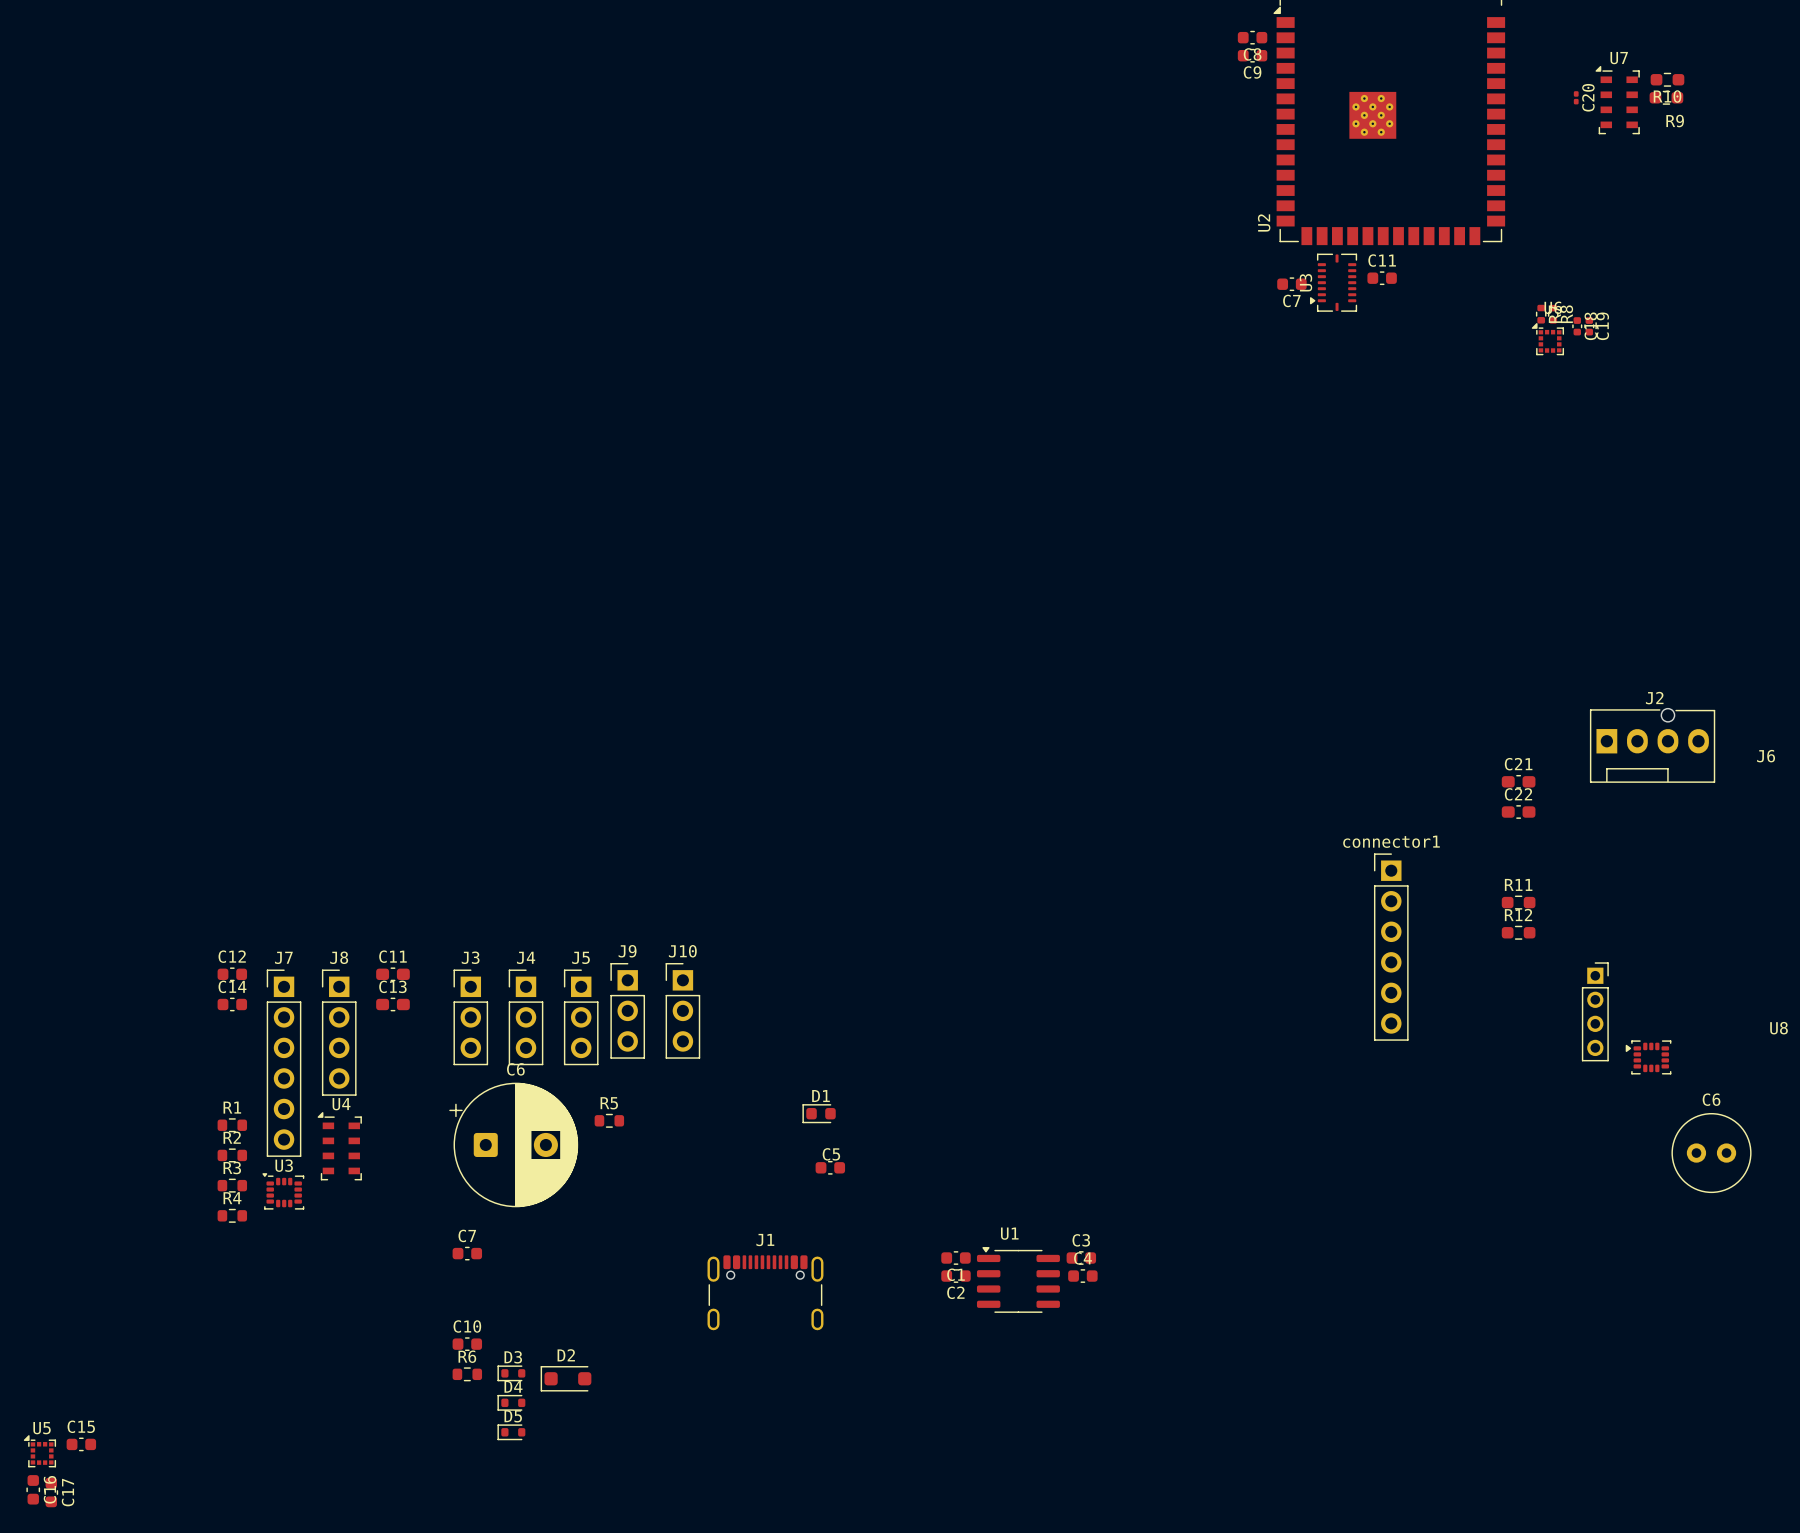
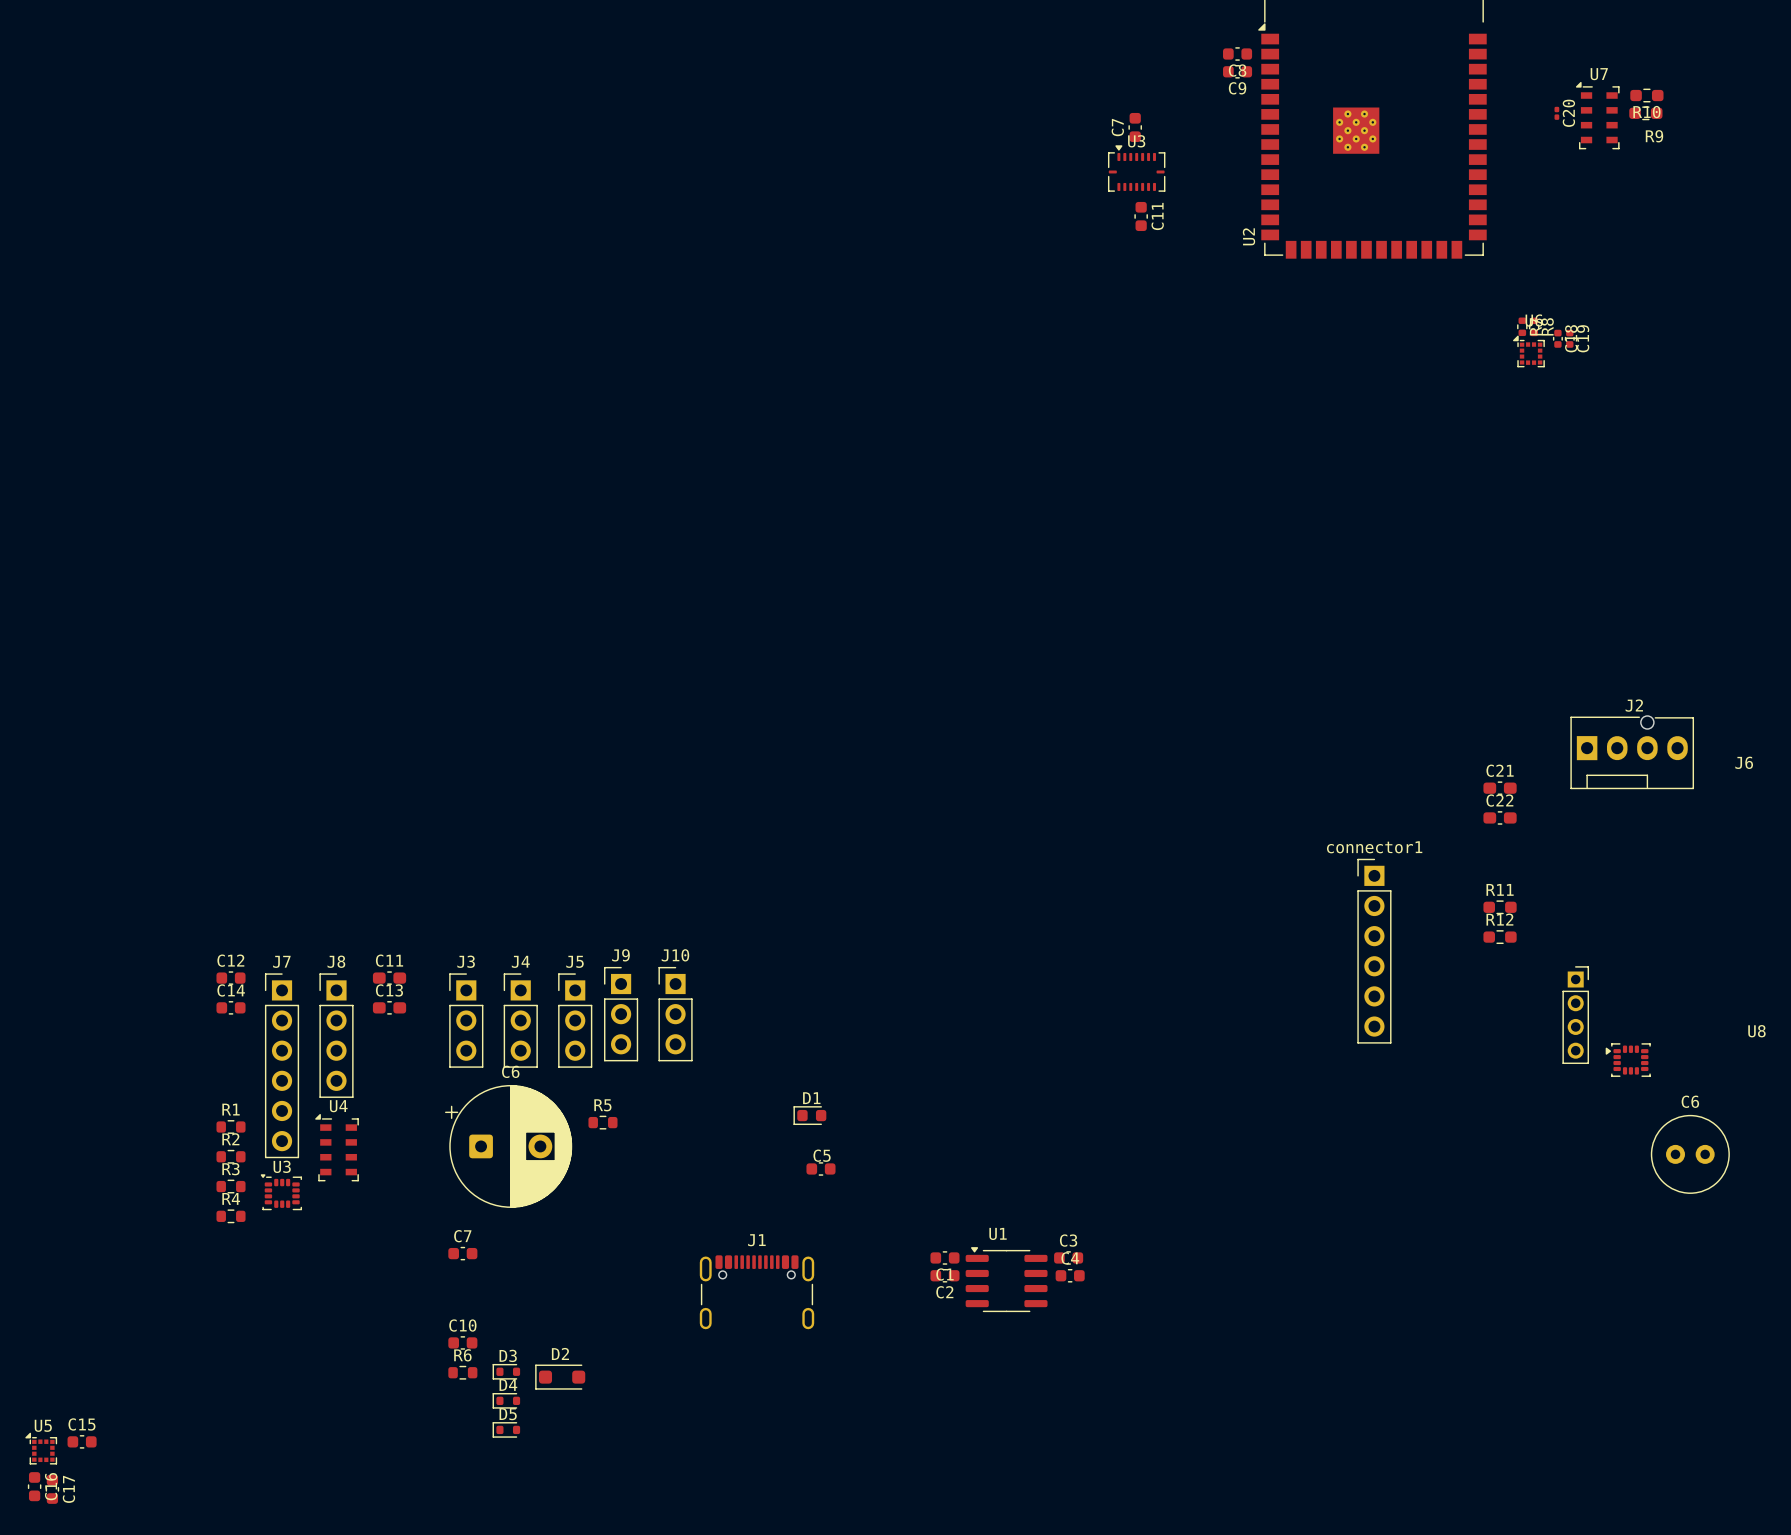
C11 rotation: 0° (1382, 278) -> 90° clockwise (1141, 216)
C11 position: (1382, 278) -> (1141, 216)
U3 rotation: 0° (1333, 282) -> 90° clockwise (1136, 168)
U3 position: (1333, 282) -> (1136, 168)
C7 rotation: 0° (1291, 284) -> 90° clockwise (1135, 127)
C7 position: (1291, 284) -> (1135, 127)

